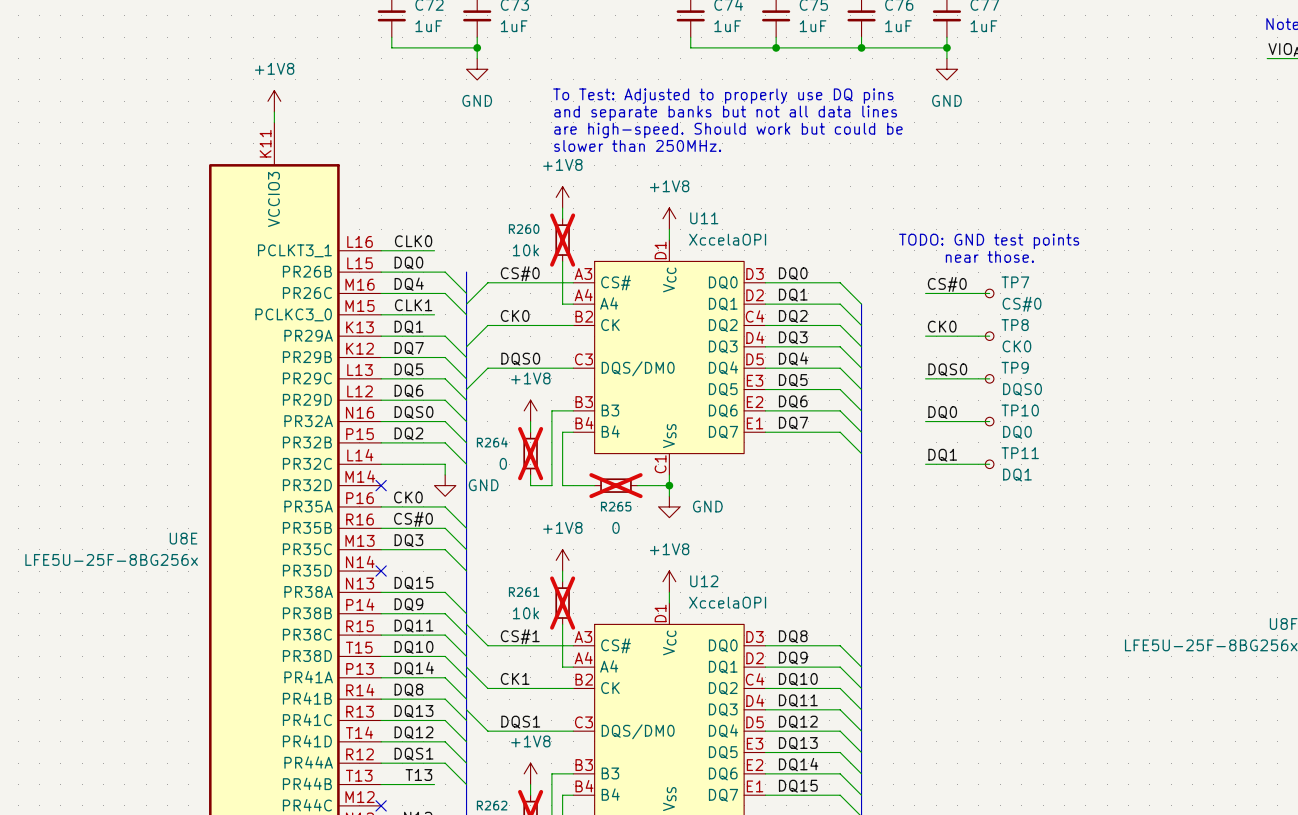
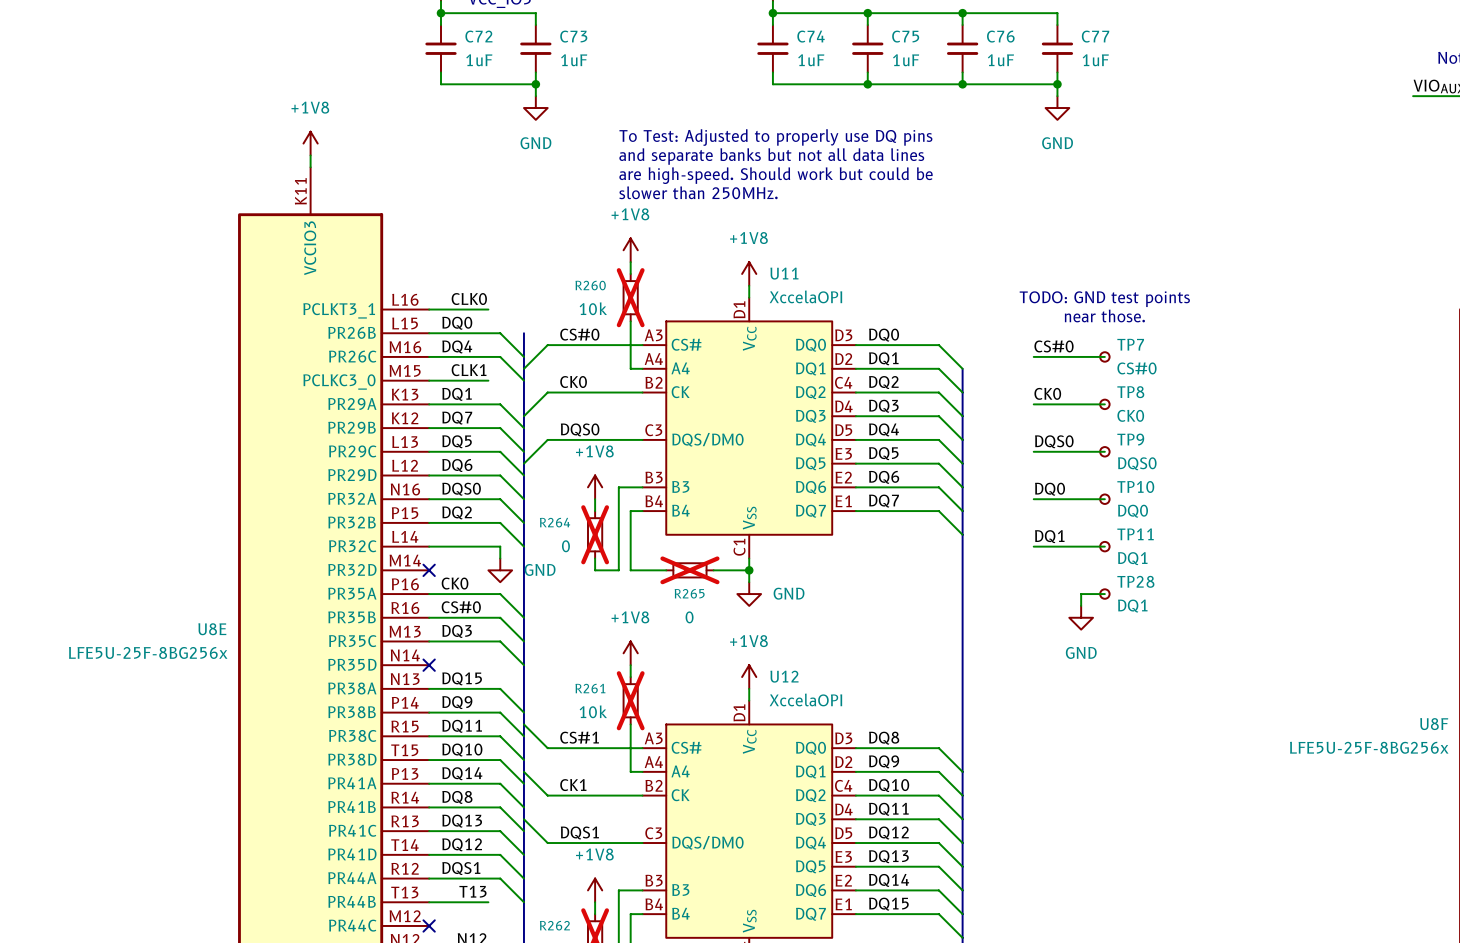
wire: none -> (1104, 594) (1081, 594) (1081, 605)
TP28: none -> DQ1 (1104, 594)
power symbol: none -> GND (1081, 617)

